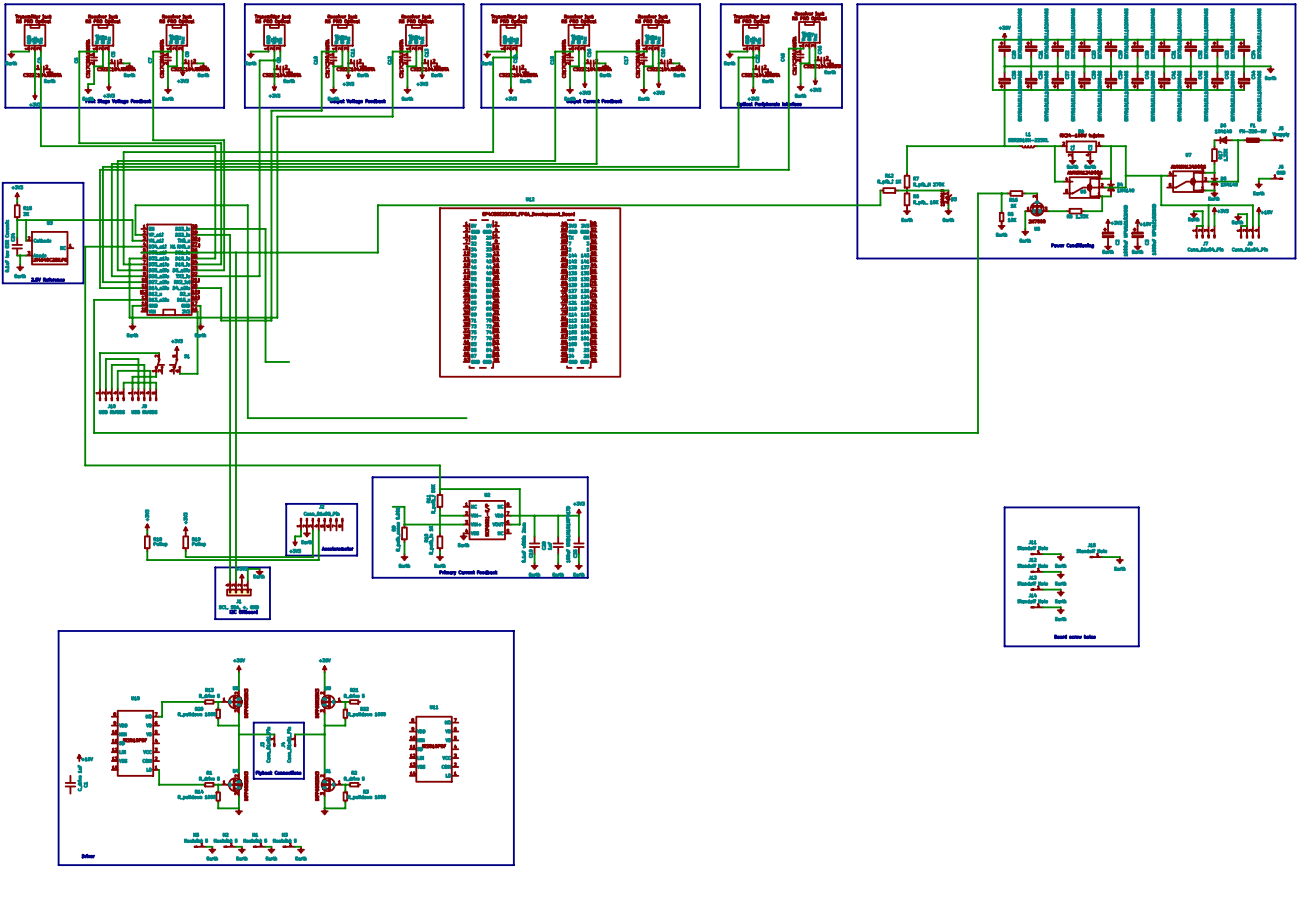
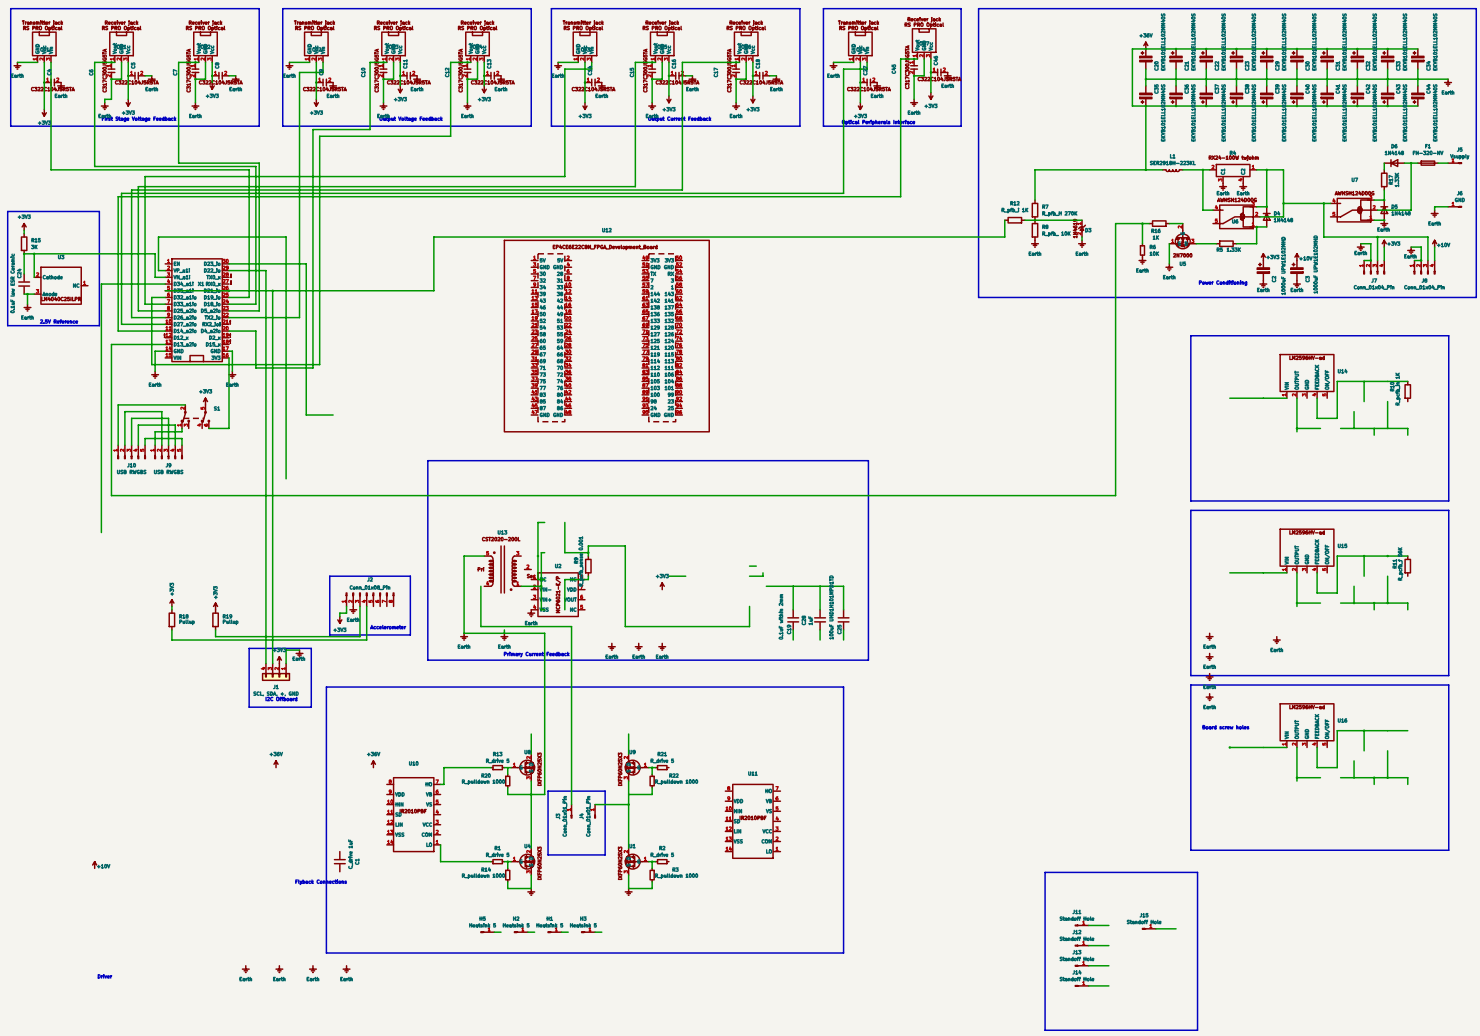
line: none -> (1190, 335) (1190, 500) (1448, 500) (1448, 335) (1190, 335)
part: none -> (1307, 376)
wire: none -> (1364, 381) (1364, 401)
wire: none -> (1407, 381) (1337, 381) (1337, 418) (1317, 418) (1317, 398)
wire: none -> (1229, 398) (1286, 398)
wire: none -> (1296, 398) (1296, 431)
wire: none -> (1387, 401) (1387, 428)
wire: none -> (1354, 411) (1354, 428)
wire: none -> (1296, 428) (1320, 428)
wire: none -> (1340, 428) (1407, 428) (1407, 435)
wire: none -> (1374, 428) (1374, 435)
wire: (247, 418) (466, 418) -> none
line: none -> (1190, 510) (1448, 510) (1448, 675) (1190, 675) (1190, 510)
wire: none -> (544, 522) (537, 522) (537, 579) (544, 579)
wire: none -> (564, 522) (564, 552) (588, 552)
wire: (85, 465) (439, 465) (439, 492) -> none
line: (372, 477) (587, 477) (587, 577) -> (427, 545) (427, 460) (868, 460) (868, 660) (672, 660)
part: none -> (1307, 551)
wire: none -> (544, 552) (541, 552) (541, 609) (544, 609)
junction: none -> (537, 556)
wire: none -> (588, 556) (588, 545) (625, 545) (625, 626) (749, 626) (749, 606)
wire: none -> (1364, 556) (1364, 576)
wire: none -> (1407, 556) (1337, 556) (1337, 592) (1317, 592) (1317, 572)
wire: (439, 489) (519, 489) (519, 524) (510, 524) -> none
wire: none -> (749, 566) (756, 566)
part: none -> (507, 569)
part position: (439, 500) -> (1407, 566)
wire: none -> (762, 572) (762, 576) (749, 576)
wire: none -> (1229, 572) (1286, 572)
wire: none -> (1296, 572) (1296, 606)
wire: none -> (588, 576) (588, 579) (564, 579) (564, 609)
wire: none -> (668, 576) (685, 576)
wire: none -> (1387, 576) (1387, 603)
wire: (392, 506) (404, 506) -> (484, 556) (464, 556) (464, 579)
line: (1004, 507) (1138, 507) (1138, 646) (1004, 646) (1004, 507) -> none
wire: (439, 509) (439, 533) -> none
wire: none -> (480, 586) (480, 626) (571, 626) (571, 804)
wire: none -> (521, 586) (541, 586)
wire: none -> (766, 586) (843, 586) (843, 609)
wire: none -> (793, 586) (793, 609)
wire: none -> (820, 586) (820, 609)
wire: none -> (1354, 586) (1354, 603)
wire: (439, 515) (463, 515) -> none
wire: (510, 515) (578, 515) (578, 536) -> none
wire: (534, 515) (534, 536) -> none
wire: (558, 515) (558, 536) -> none
wire: (404, 524) (463, 524) -> (464, 599) (464, 619)
wire: none -> (1296, 603) (1320, 603)
wire: none -> (1340, 603) (1407, 603) (1407, 609)
wire: none -> (1374, 603) (1374, 609)
part position: (404, 533) -> (588, 566)
part position: (439, 542) -> (1407, 391)
part position: (534, 545) -> (793, 619)
part position: (558, 545) -> (820, 619)
part position: (578, 545) -> (843, 619)
wire: none -> (793, 629) (793, 640)
wire: none -> (820, 629) (820, 640)
wire: none -> (843, 629) (843, 640)
wire: none -> (464, 633) (544, 633) (544, 794) (507, 794) (507, 787)
wire: (534, 554) (534, 562) -> none
wire: (558, 554) (558, 562) -> none
wire: (578, 554) (578, 562) -> none
part position: (1037, 554) -> (1081, 925)
wire: (1043, 554) (1060, 554) -> none
part position: (1096, 557) -> (1149, 928)
wire: (1102, 557) (1119, 557) -> none
part position: (1037, 571) -> (1081, 945)
wire: (1043, 571) (1060, 571) -> none
part position: (1037, 589) -> (1081, 965)
wire: (1043, 589) (1060, 589) -> none
line: none -> (1190, 685) (1190, 850) (1448, 850) (1448, 685) (1190, 685)
line: none -> (326, 687) (843, 687) (843, 953) (326, 953) (326, 687)
part position: (1037, 607) -> (1081, 985)
wire: (1043, 607) (1060, 607) -> none
line: (58, 630) (513, 630) (513, 865) (58, 865) (58, 630) -> none
part: none -> (1307, 725)
wire: none -> (1364, 730) (1364, 750)
wire: none -> (1407, 730) (1337, 730) (1337, 767) (1317, 767) (1317, 747)
wire: none -> (531, 734) (531, 754)
wire: none -> (628, 734) (628, 754)
wire: none -> (1229, 747) (1286, 747)
junction: none -> (1229, 747)
wire: none -> (1296, 747) (1296, 781)
wire: none -> (1387, 750) (1387, 777)
wire: none -> (1354, 760) (1354, 777)
wire: (238, 672) (238, 690) -> none
wire: (324, 672) (324, 690) -> none
wire: none -> (490, 767) (443, 767) (443, 784) (440, 784)
wire: none -> (504, 767) (511, 767)
wire: none -> (507, 767) (507, 774)
wire: none -> (648, 767) (655, 767)
wire: none -> (652, 767) (652, 774)
wire: none -> (1296, 777) (1320, 777)
wire: none -> (1340, 777) (1407, 777) (1407, 784)
wire: none -> (1374, 777) (1374, 784)
wire: none -> (531, 781) (531, 848)
wire: none -> (628, 781) (628, 848)
wire: none -> (652, 787) (652, 794) (628, 794)
line: none -> (548, 791) (605, 791) (605, 854) (548, 854) (548, 791)
wire: (203, 701) (162, 701) (162, 716) (159, 716) -> none
part position: (209, 701) -> (497, 767)
wire: (215, 701) (221, 701) -> none
wire: (218, 701) (218, 707) -> none
part position: (231, 701) -> (523, 767)
part position: (331, 701) -> (636, 767)
wire: (342, 701) (348, 701) -> none
part position: (354, 701) -> (662, 767)
wire: none -> (595, 804) (628, 804)
part position: (218, 713) -> (507, 781)
wire: (238, 713) (238, 772) -> none
wire: (324, 713) (324, 772) -> none
part position: (345, 713) -> (652, 781)
wire: (218, 719) (218, 725) (238, 725) -> none
wire: (345, 719) (345, 725) (324, 725) -> none
line: (253, 722) (303, 722) (303, 778) (253, 778) (253, 722) -> none
wire: (238, 734) (274, 734) -> none
wire: (295, 734) (324, 734) -> none
part position: (274, 740) -> (571, 811)
part position: (295, 740) -> (595, 811)
wire: none -> (440, 844) (440, 861) (490, 861)
part position: (135, 743) -> (413, 814)
part position: (434, 749) -> (752, 821)
wire: none -> (504, 861) (511, 861)
wire: none -> (507, 861) (507, 868)
wire: none -> (648, 861) (655, 861)
wire: none -> (652, 861) (652, 868)
line: none -> (1045, 872) (1197, 872) (1197, 1030) (1045, 1030) (1045, 872)
wire: none -> (531, 875) (531, 888) (507, 888) (507, 881)
wire: none -> (628, 875) (628, 888) (652, 888) (652, 881)
wire: (159, 769) (159, 784) (203, 784) -> none
power symbol: none -> (531, 891)
power symbol: none -> (628, 891)
part position: (70, 784) -> (339, 861)
part position: (209, 784) -> (497, 861)
wire: (215, 784) (221, 784) -> none
wire: (218, 784) (218, 790) -> none
part position: (231, 784) -> (523, 861)
part position: (331, 784) -> (636, 861)
wire: (342, 784) (348, 784) -> none
wire: (345, 784) (345, 790) -> none
part position: (354, 784) -> (662, 861)
part position: (218, 796) -> (507, 875)
wire: (238, 796) (238, 808) (218, 808) (218, 802) -> none
wire: (324, 796) (324, 808) (345, 808) (345, 802) -> none
part position: (345, 796) -> (652, 875)
power symbol: (238, 811) -> none
power symbol: (324, 811) -> none
wire: none -> (1088, 925) (1108, 925)
wire: none -> (1155, 928) (1176, 928)
wire: none -> (494, 932) (501, 932)
wire: none -> (527, 932) (534, 932)
wire: none -> (561, 932) (568, 932)
wire: none -> (595, 932) (601, 932)
wire: none -> (1088, 945) (1108, 945)
part position: (200, 846) -> (487, 932)
wire: (206, 846) (212, 846) -> none
part position: (229, 846) -> (521, 932)
wire: (235, 846) (241, 846) -> none
part position: (259, 846) -> (554, 932)
wire: (265, 846) (271, 846) -> none
part position: (289, 846) -> (588, 932)
wire: (295, 846) (301, 846) -> none
wire: none -> (1088, 965) (1108, 965)
wire: none -> (1088, 985) (1108, 985)

